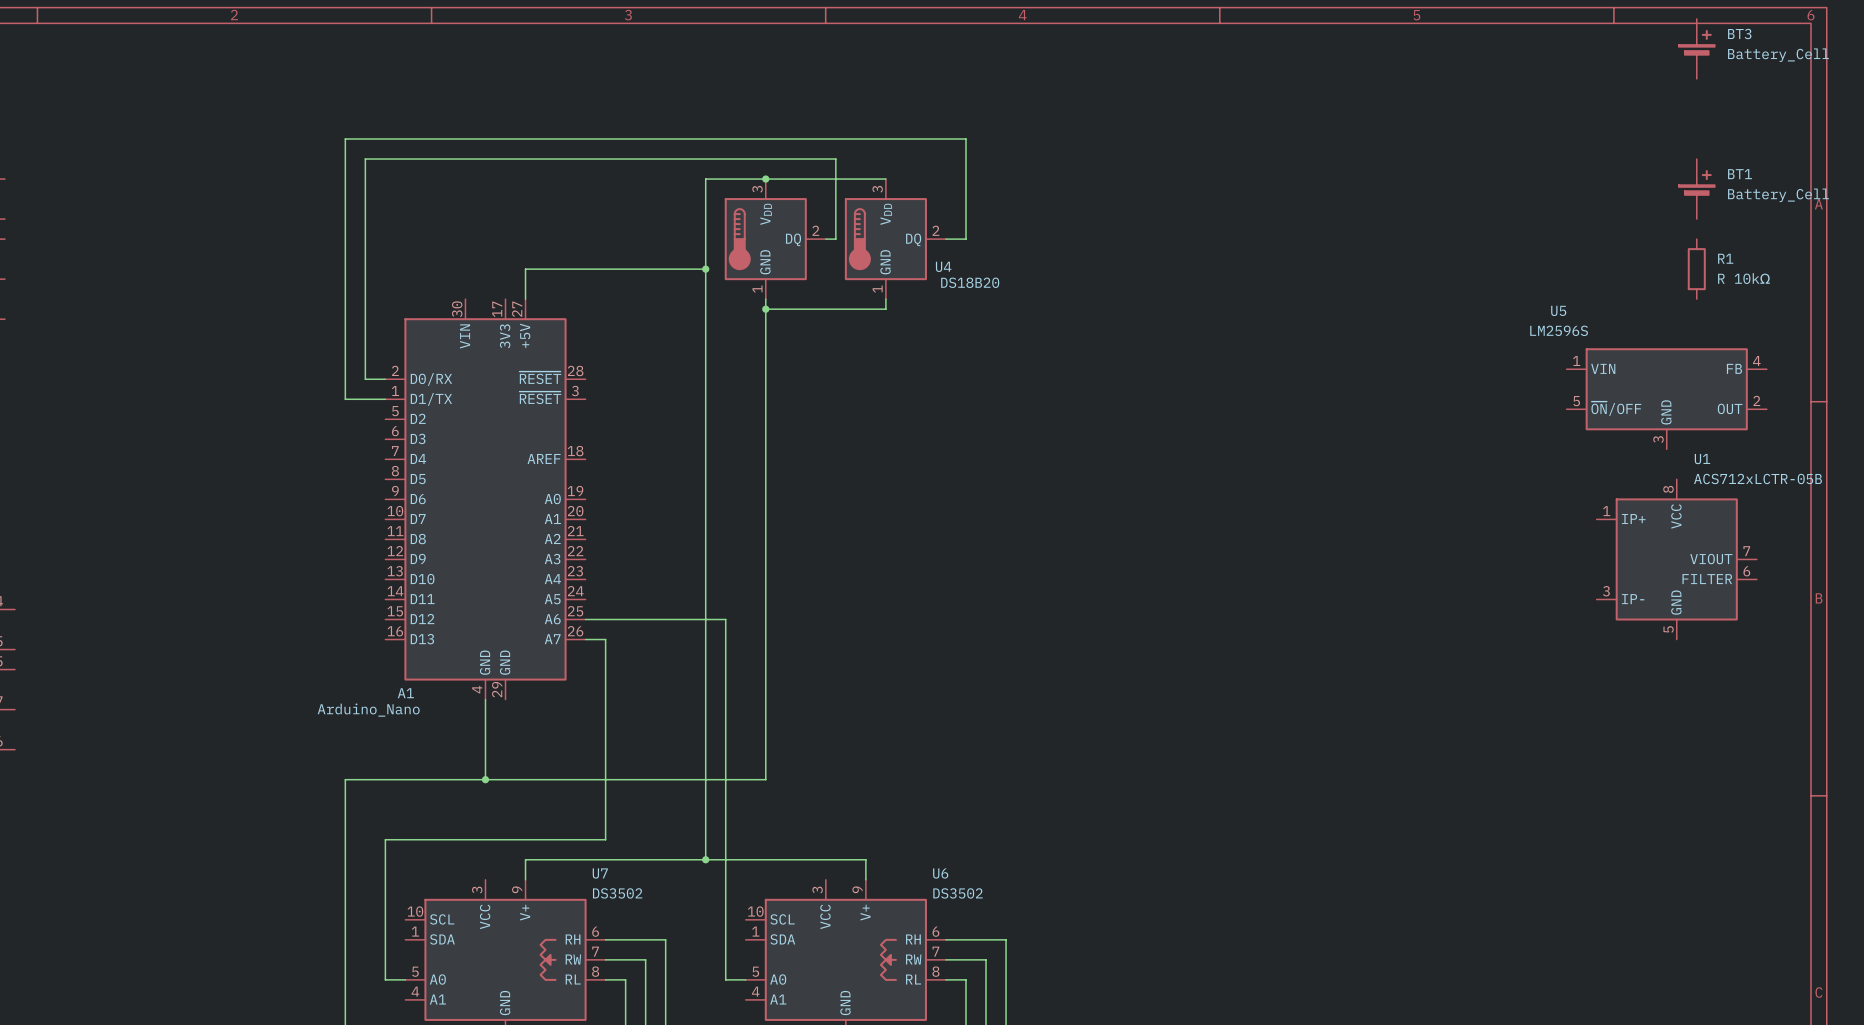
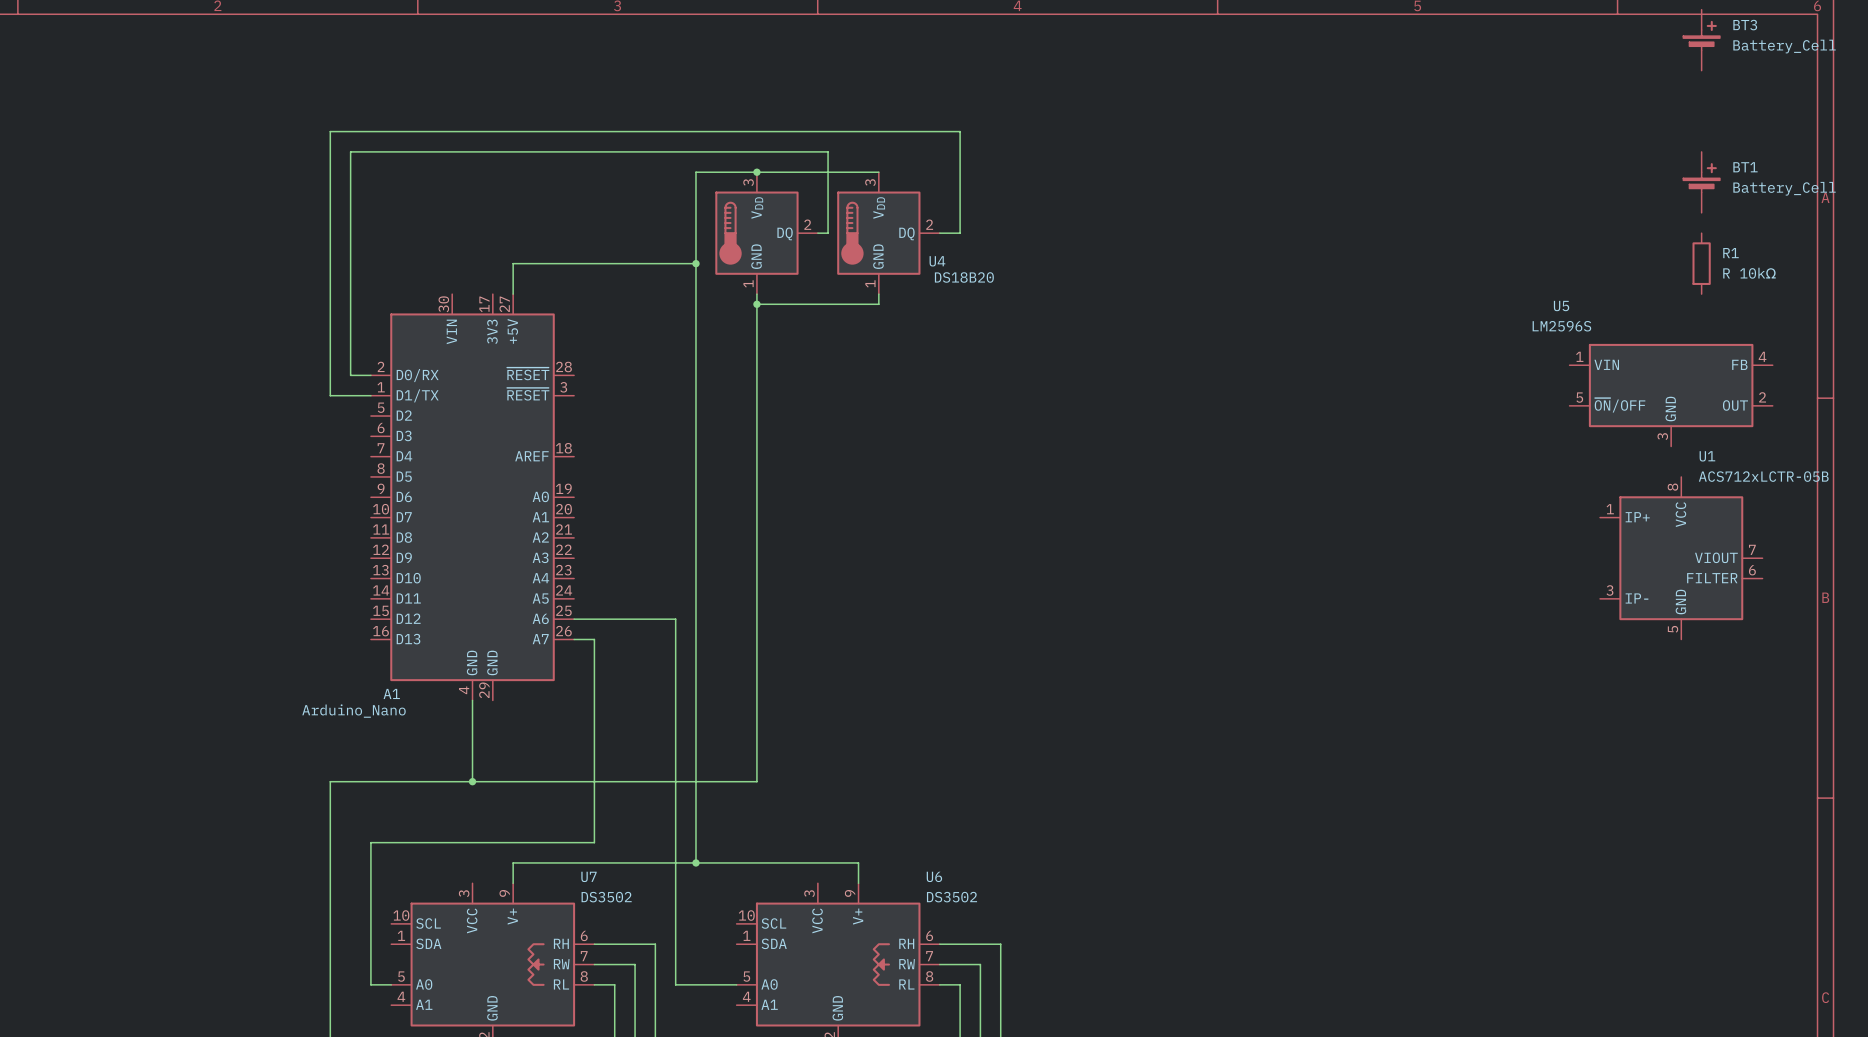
wire: (685, 619) (725, 619) (725, 979) -> (675, 619) (675, 984) (716, 984)

